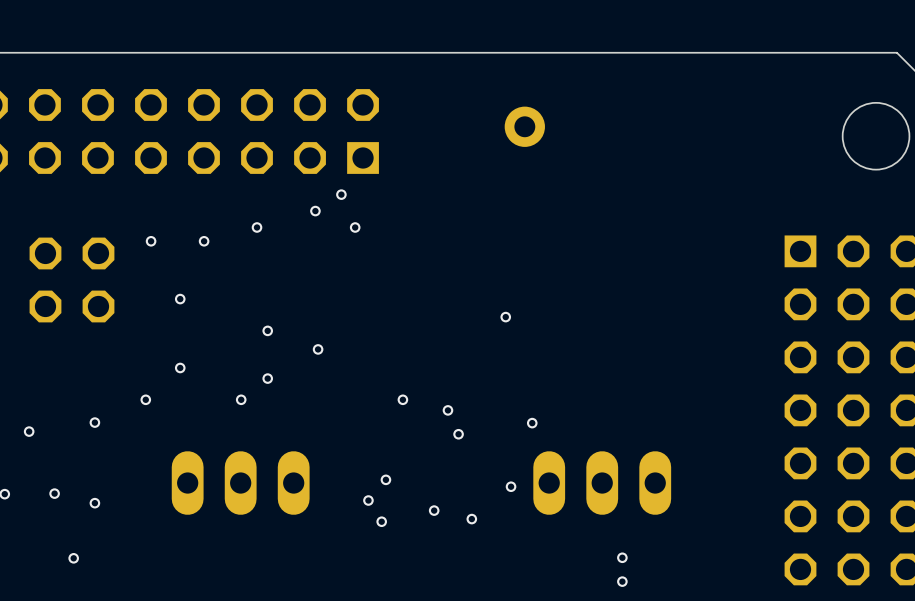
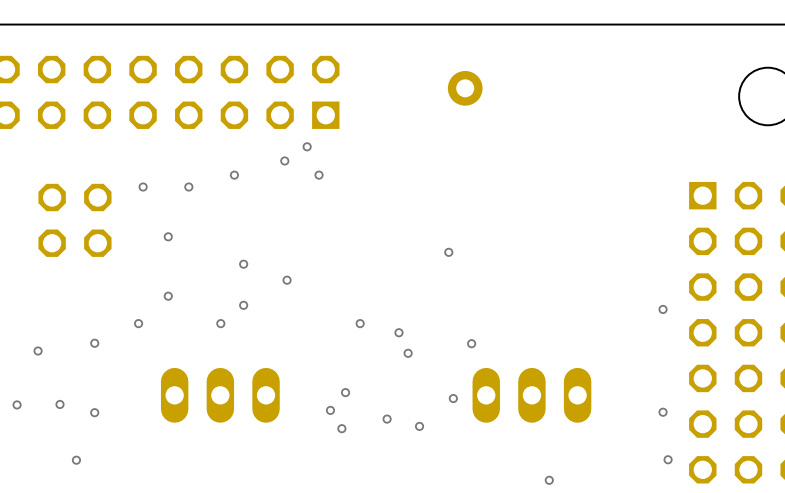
via: none -> (663, 309)
via: none -> (663, 412)
via: (622, 557) -> none
via: none -> (668, 459)

